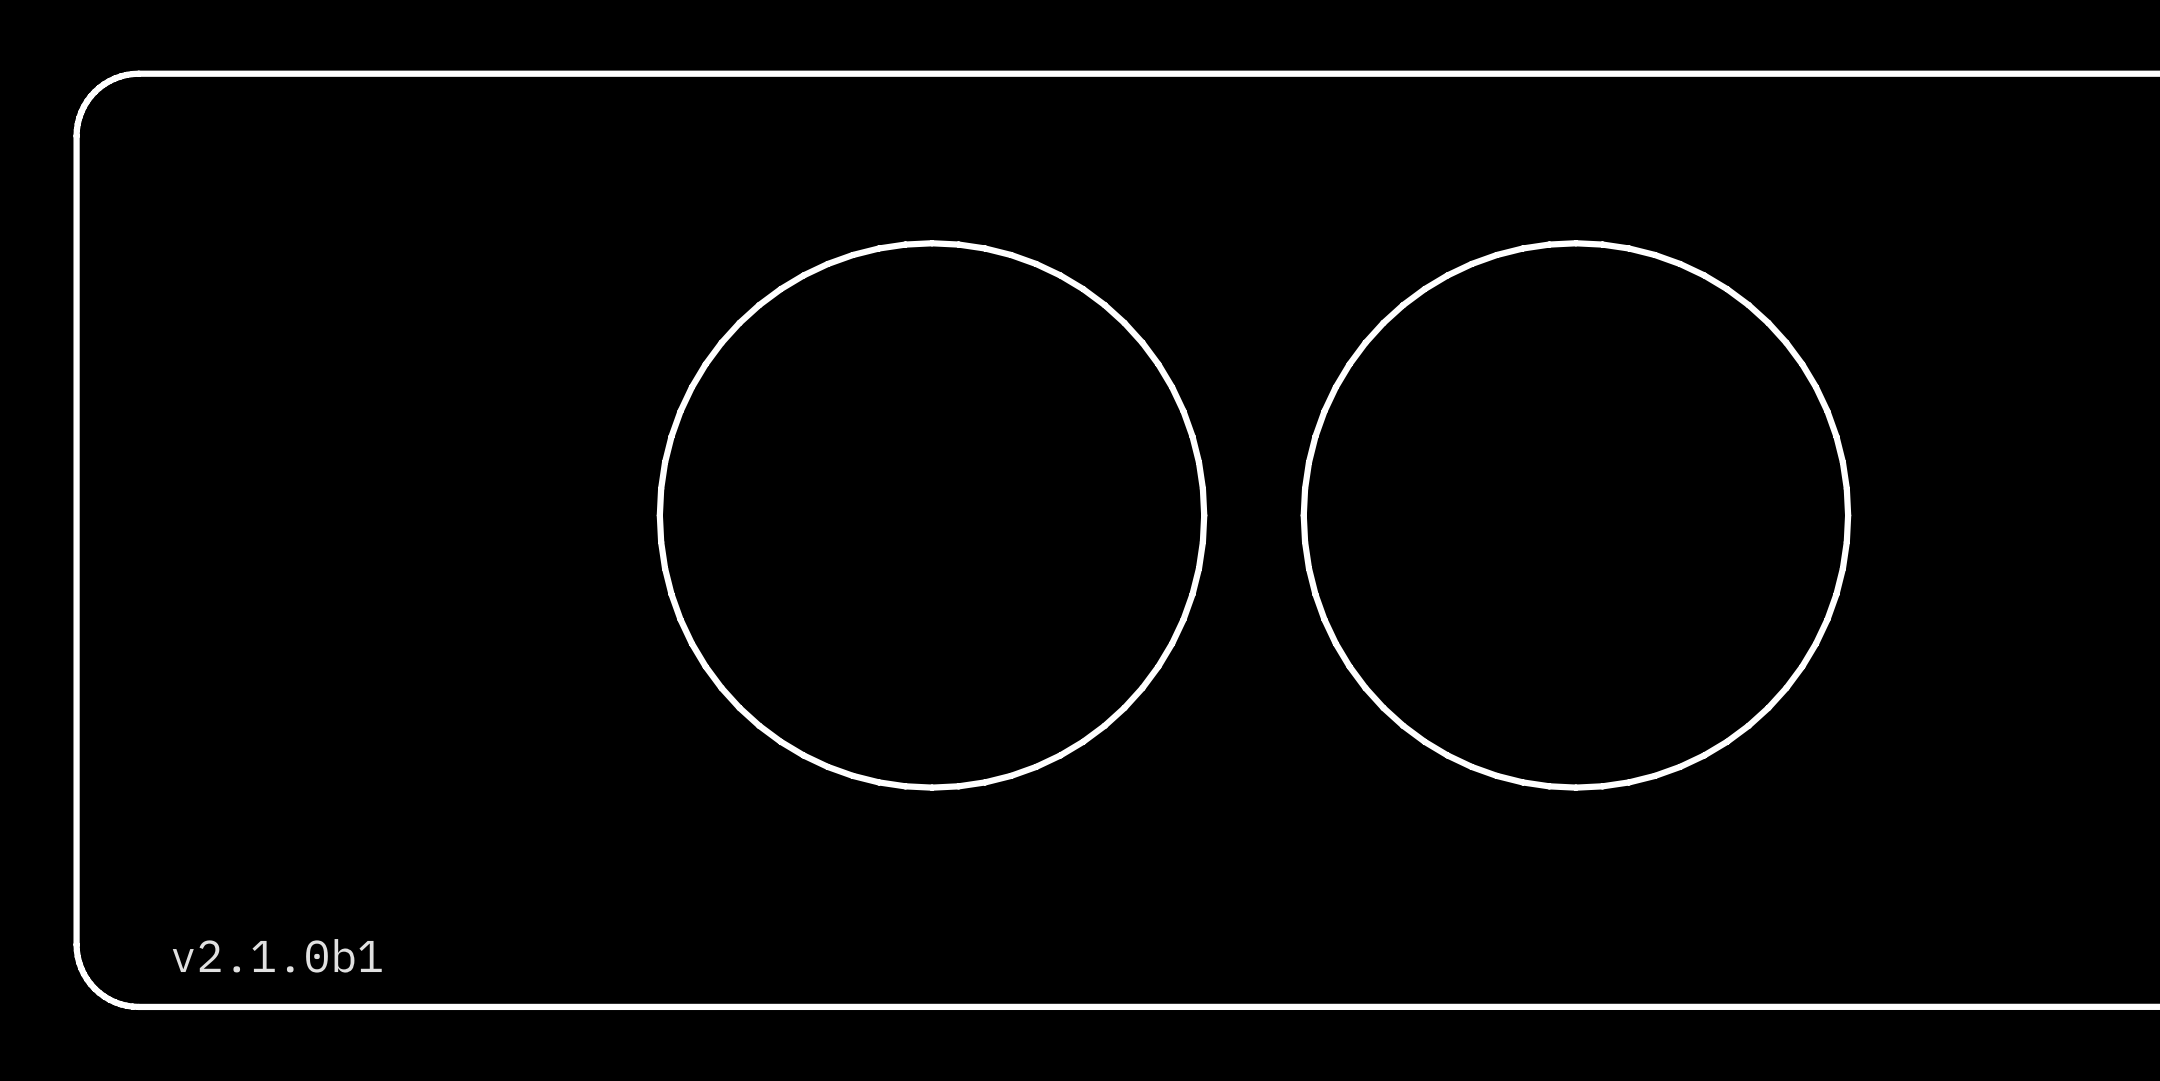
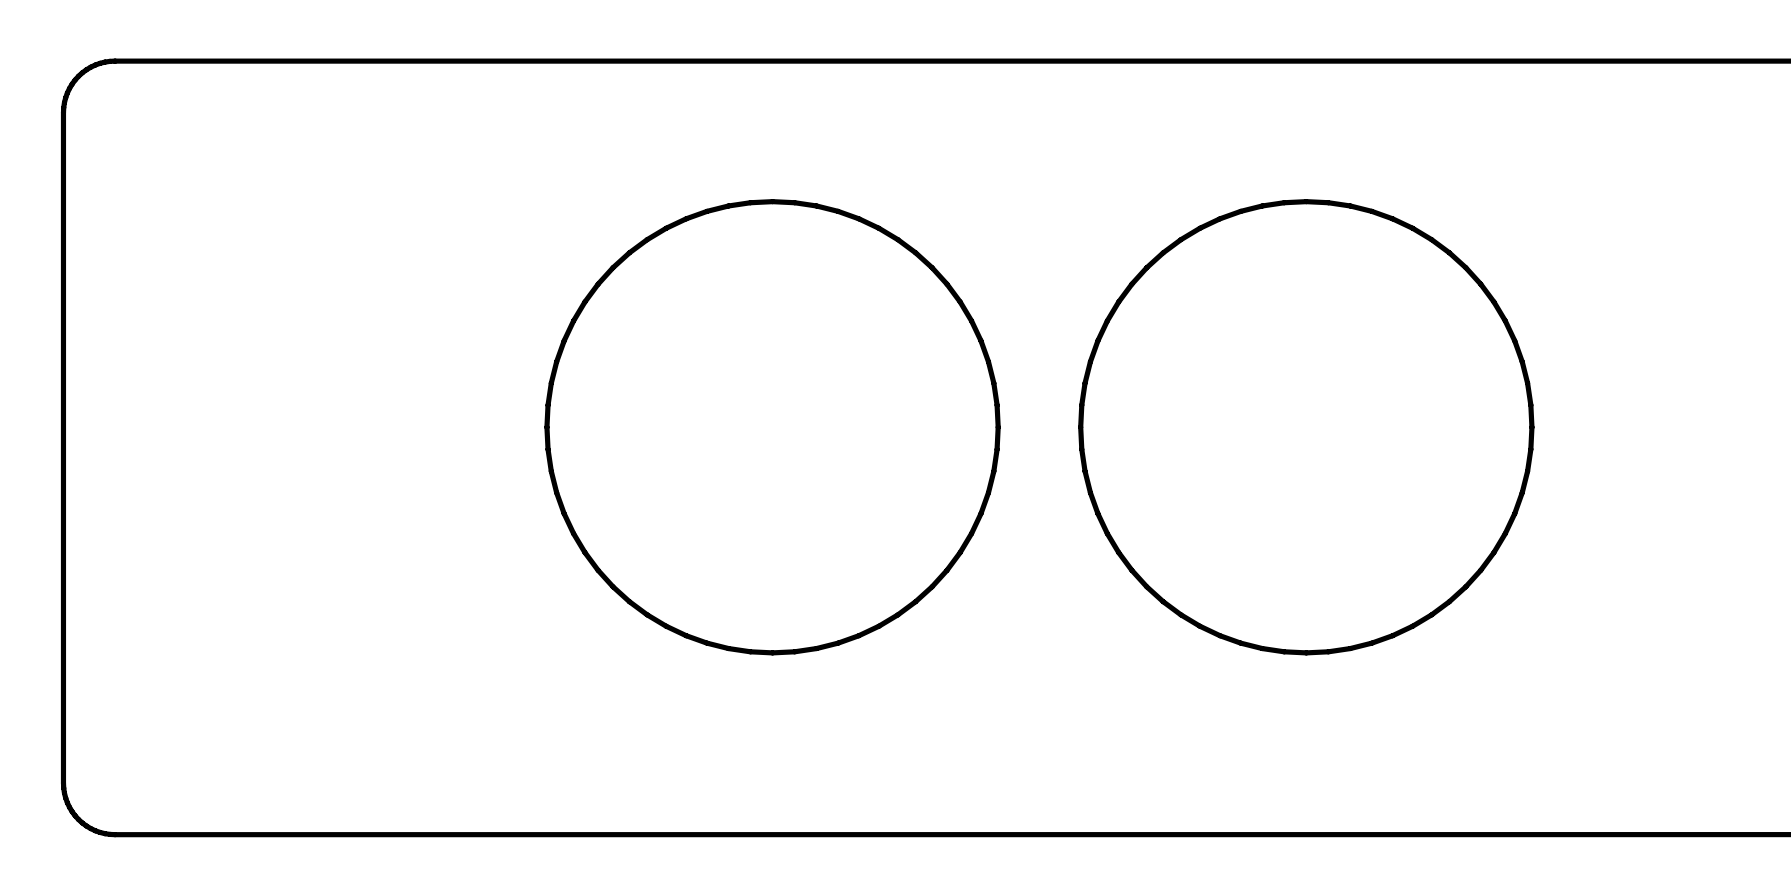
text: v2.1.0b1 (277, 955) -> none

